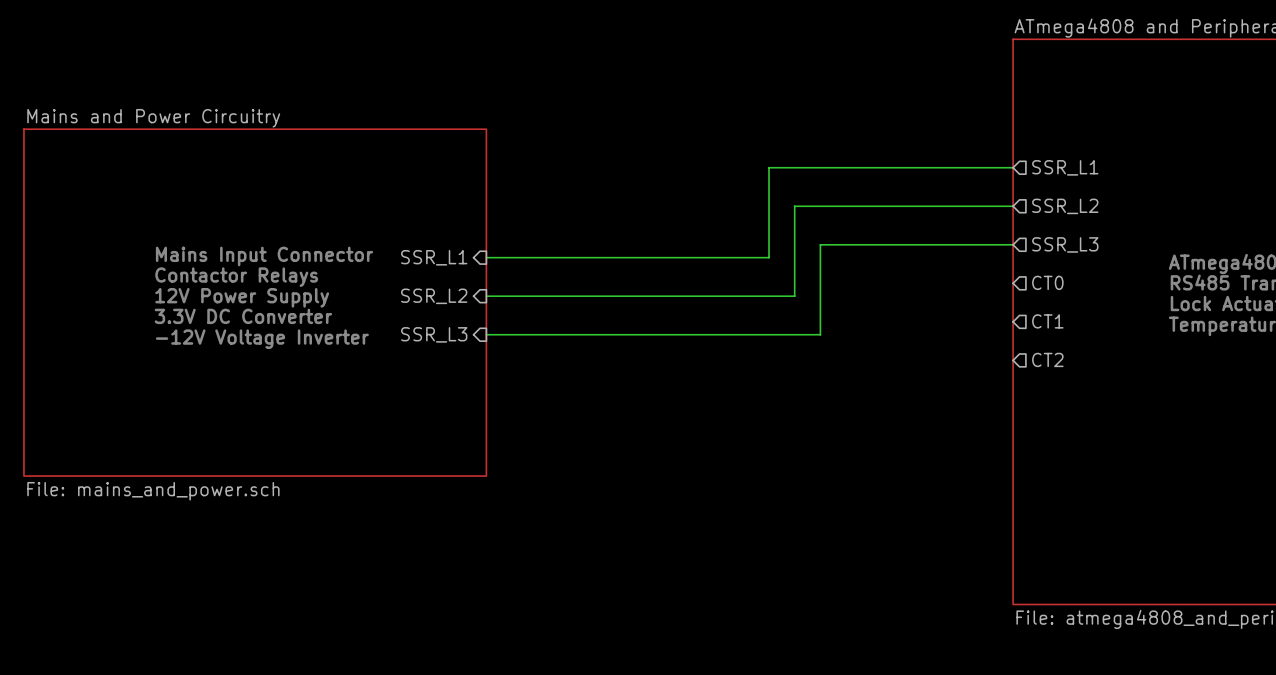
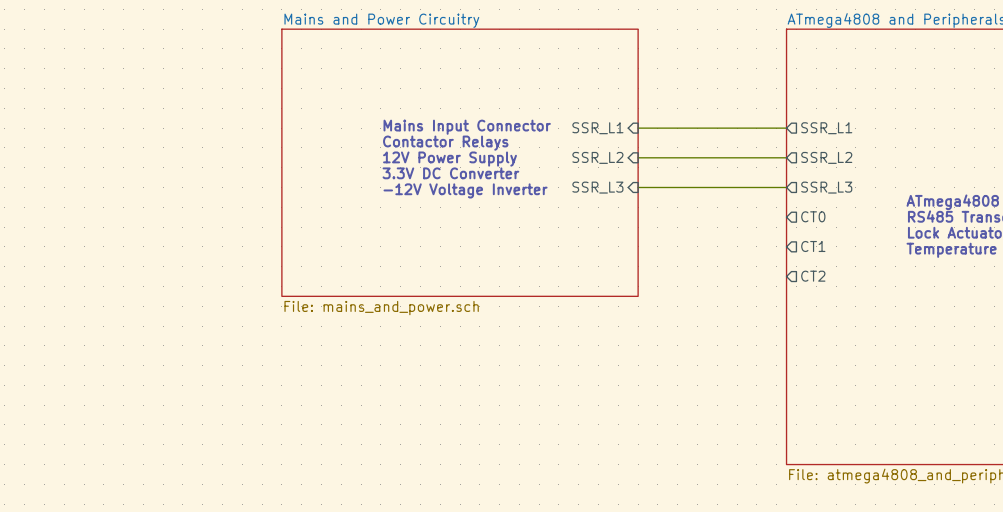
text: none -> Mains Input Connector (467, 127)
sheet pin: none -> SSR_L1 (597, 128)
wire: (820, 167) (769, 167) (769, 257) (486, 257) -> none
text: none -> Contactor Relays (445, 143)
sheet pin: none -> SSR_L2 (597, 157)
wire: (820, 206) (794, 206) (794, 296) (486, 296) -> none
text: none -> 12V Power Supply (450, 159)
sheet Mains and Power Circuitry: none -> File: mains_and_power.sch (460, 162)
text: none -> 3.3V DC Converter (450, 173)
sheet pin: none -> SSR_L3 (597, 187)
wire: (820, 244) (820, 334) (486, 334) -> none
text: none -> -12V Voltage Inverter (465, 190)
text: Mains Input Connector (264, 256) -> none
sheet pin: SSR_L1 (434, 257) -> none
text: Contactor Relays (236, 277) -> none
sheet pin: SSR_L2 (434, 296) -> none
text: 12V Power Supply (242, 297) -> none
sheet Mains and Power Circuitry: File: mains_and_power.sch (255, 302) -> none
text: 3.3V DC Converter (243, 316) -> none
sheet pin: SSR_L3 (434, 334) -> none
text: -12V Voltage Inverter (262, 339) -> none

